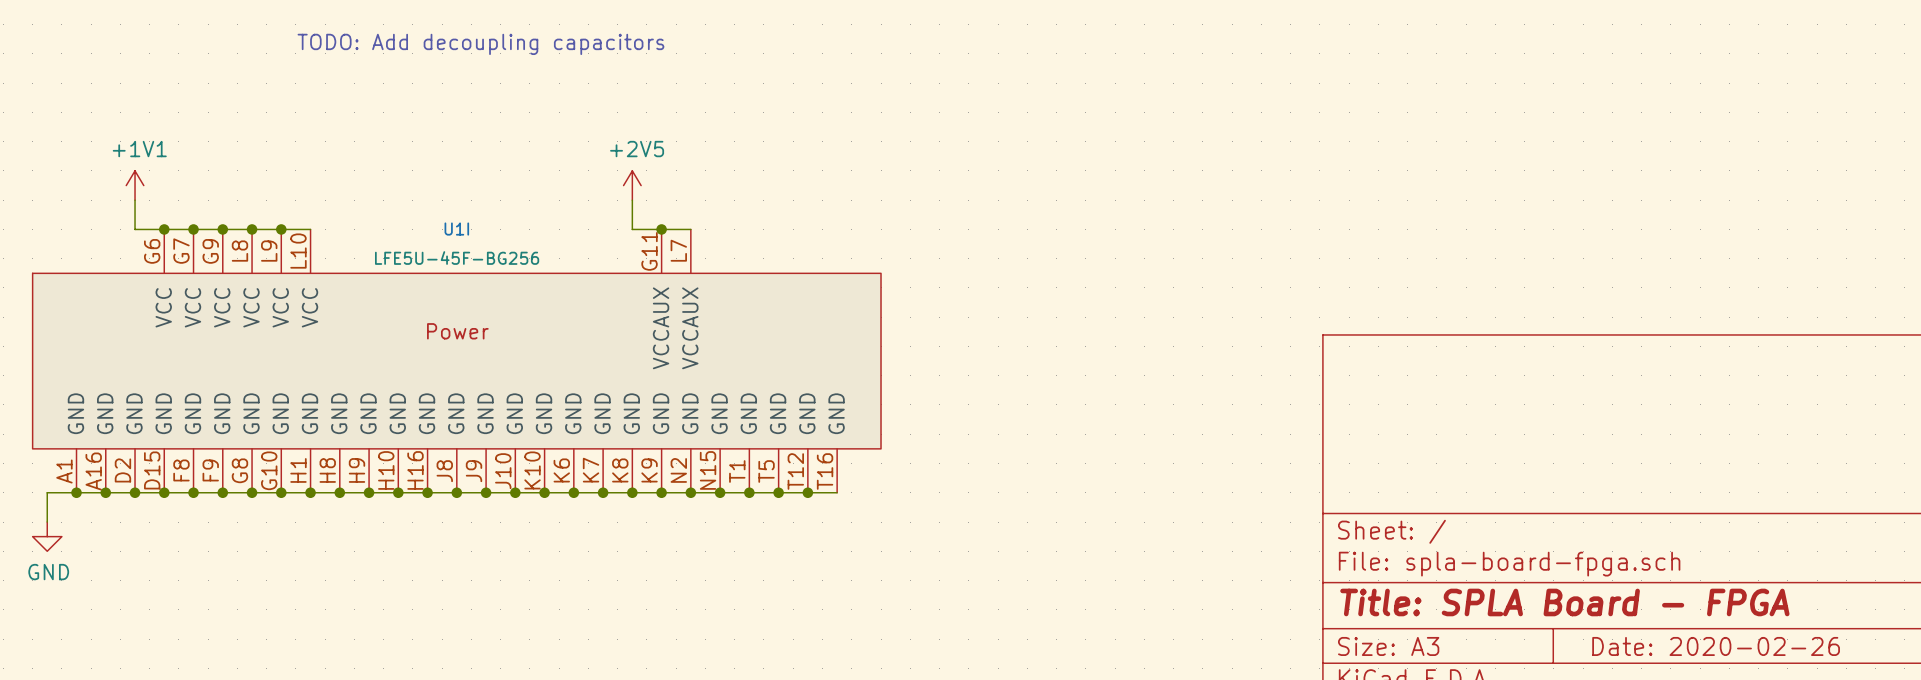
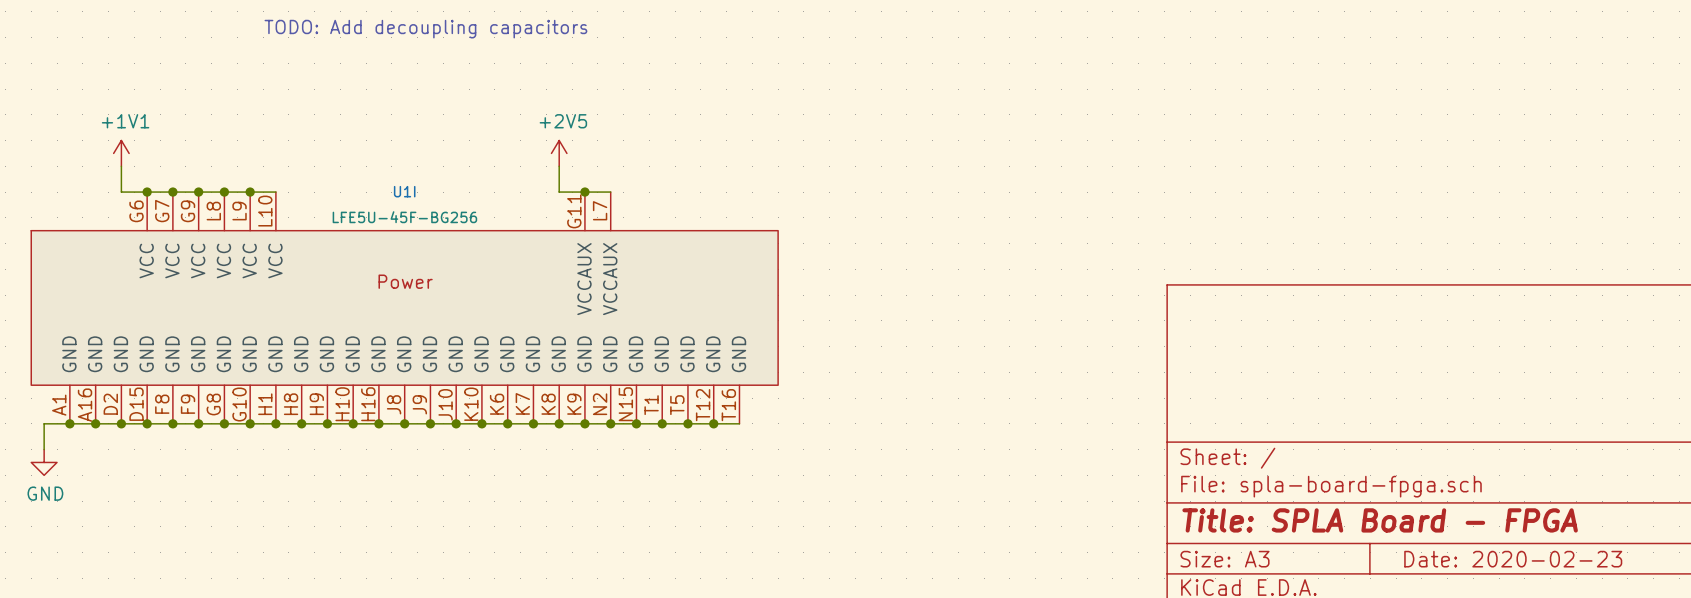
title block: Date: 2020-02-26 (1716, 646) -> Date: 2020-02-23 (1513, 559)

